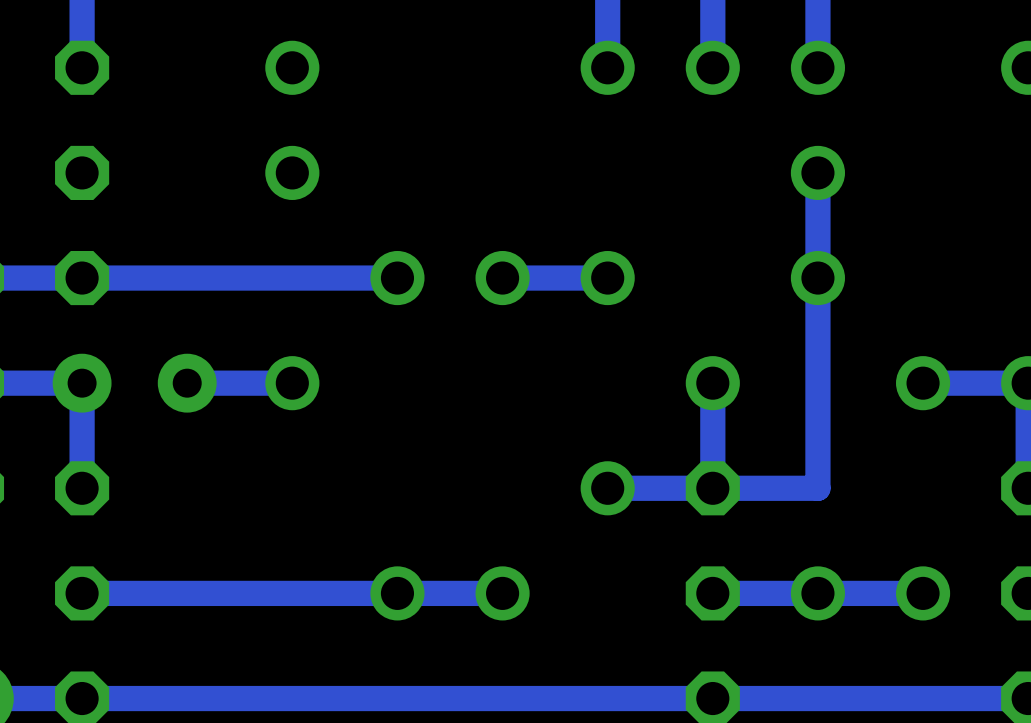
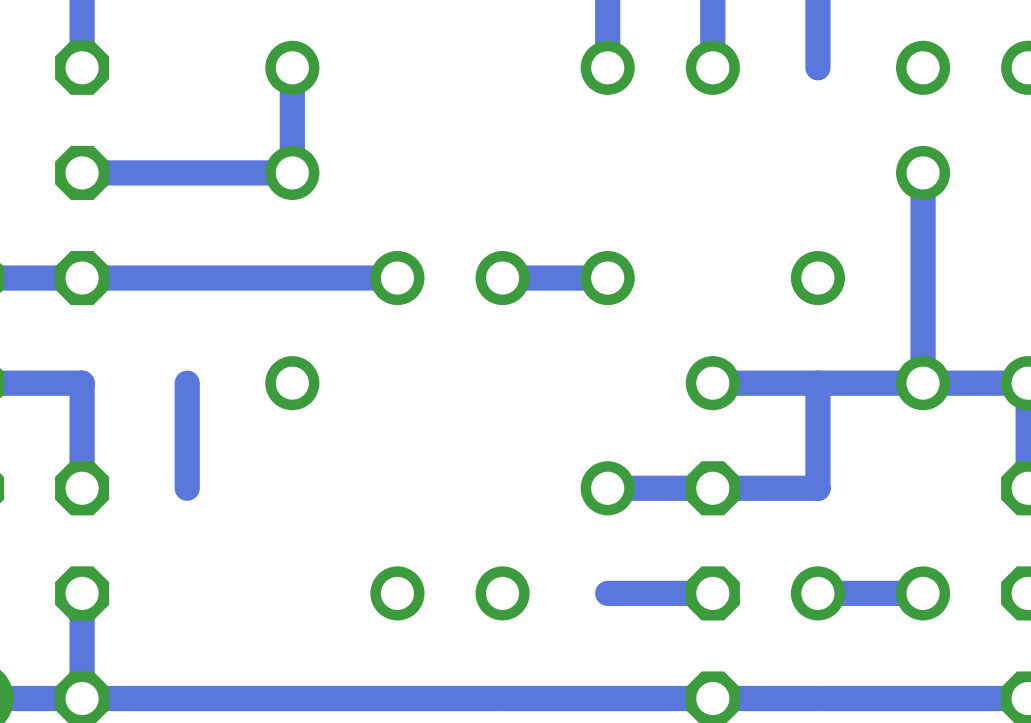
track: none -> (292, 67) (292, 172) (82, 172)
part position: (817, 120) -> (923, 120)
track: (817, 172) (817, 383) -> none
part: (134, 383) -> none
track: (292, 383) (187, 383) -> (187, 488) (187, 383)
track: (712, 383) (712, 488) -> (712, 383) (923, 383) (923, 172)
track: (502, 593) (82, 593) -> (82, 698) (82, 593)
track: (817, 593) (712, 593) -> (607, 593) (712, 593)

